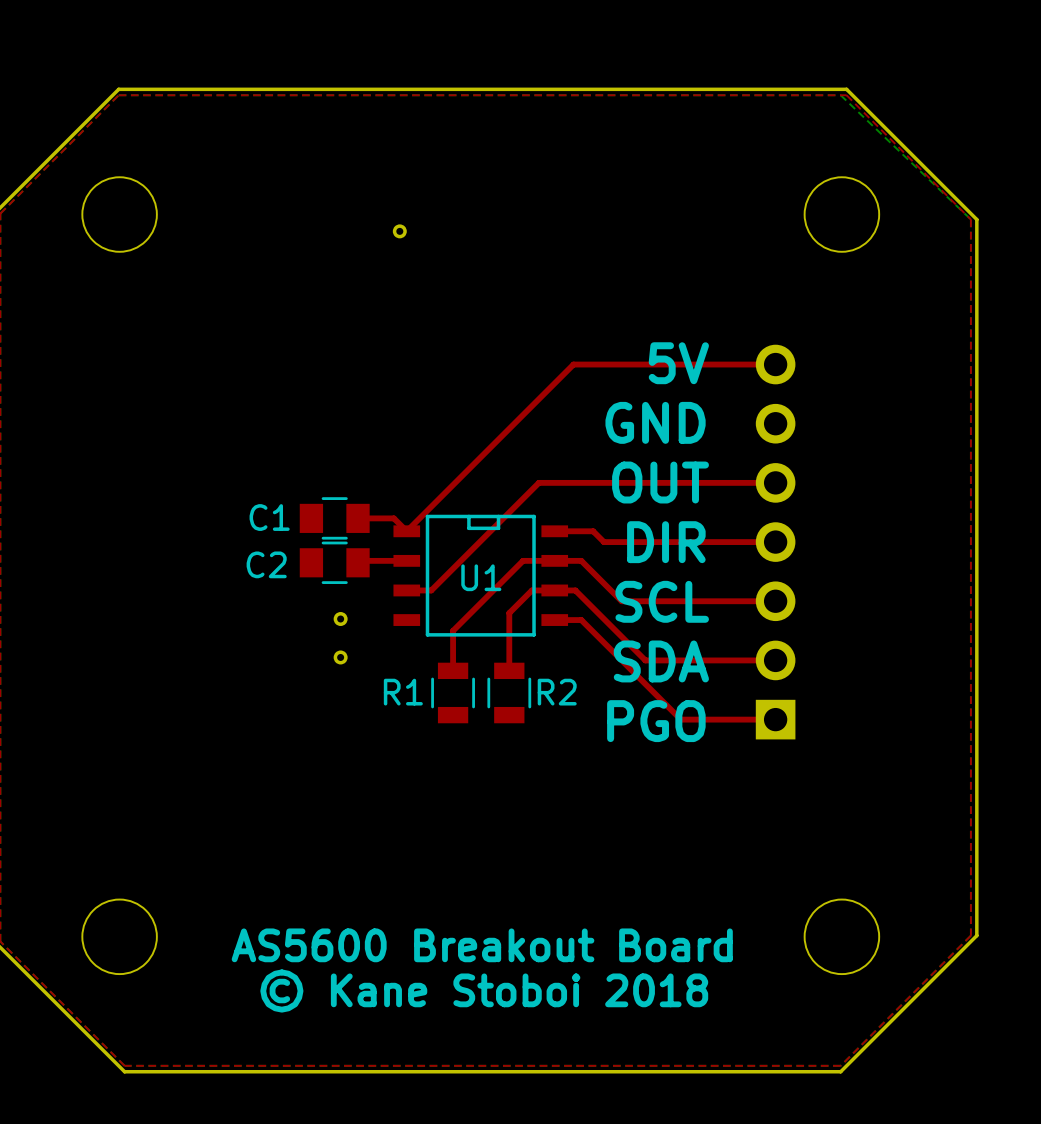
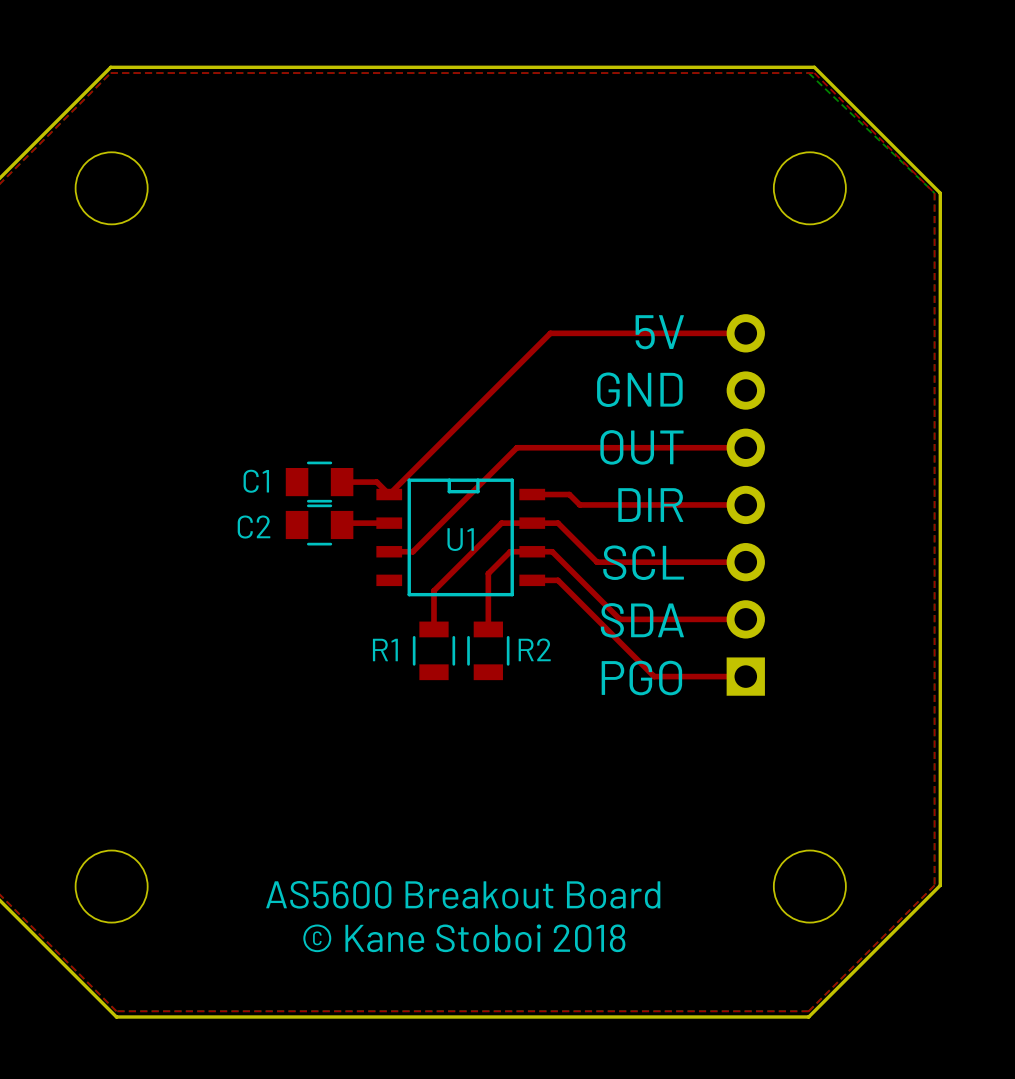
part: (399, 231) -> none
part: (340, 619) -> none
part: (340, 657) -> none

